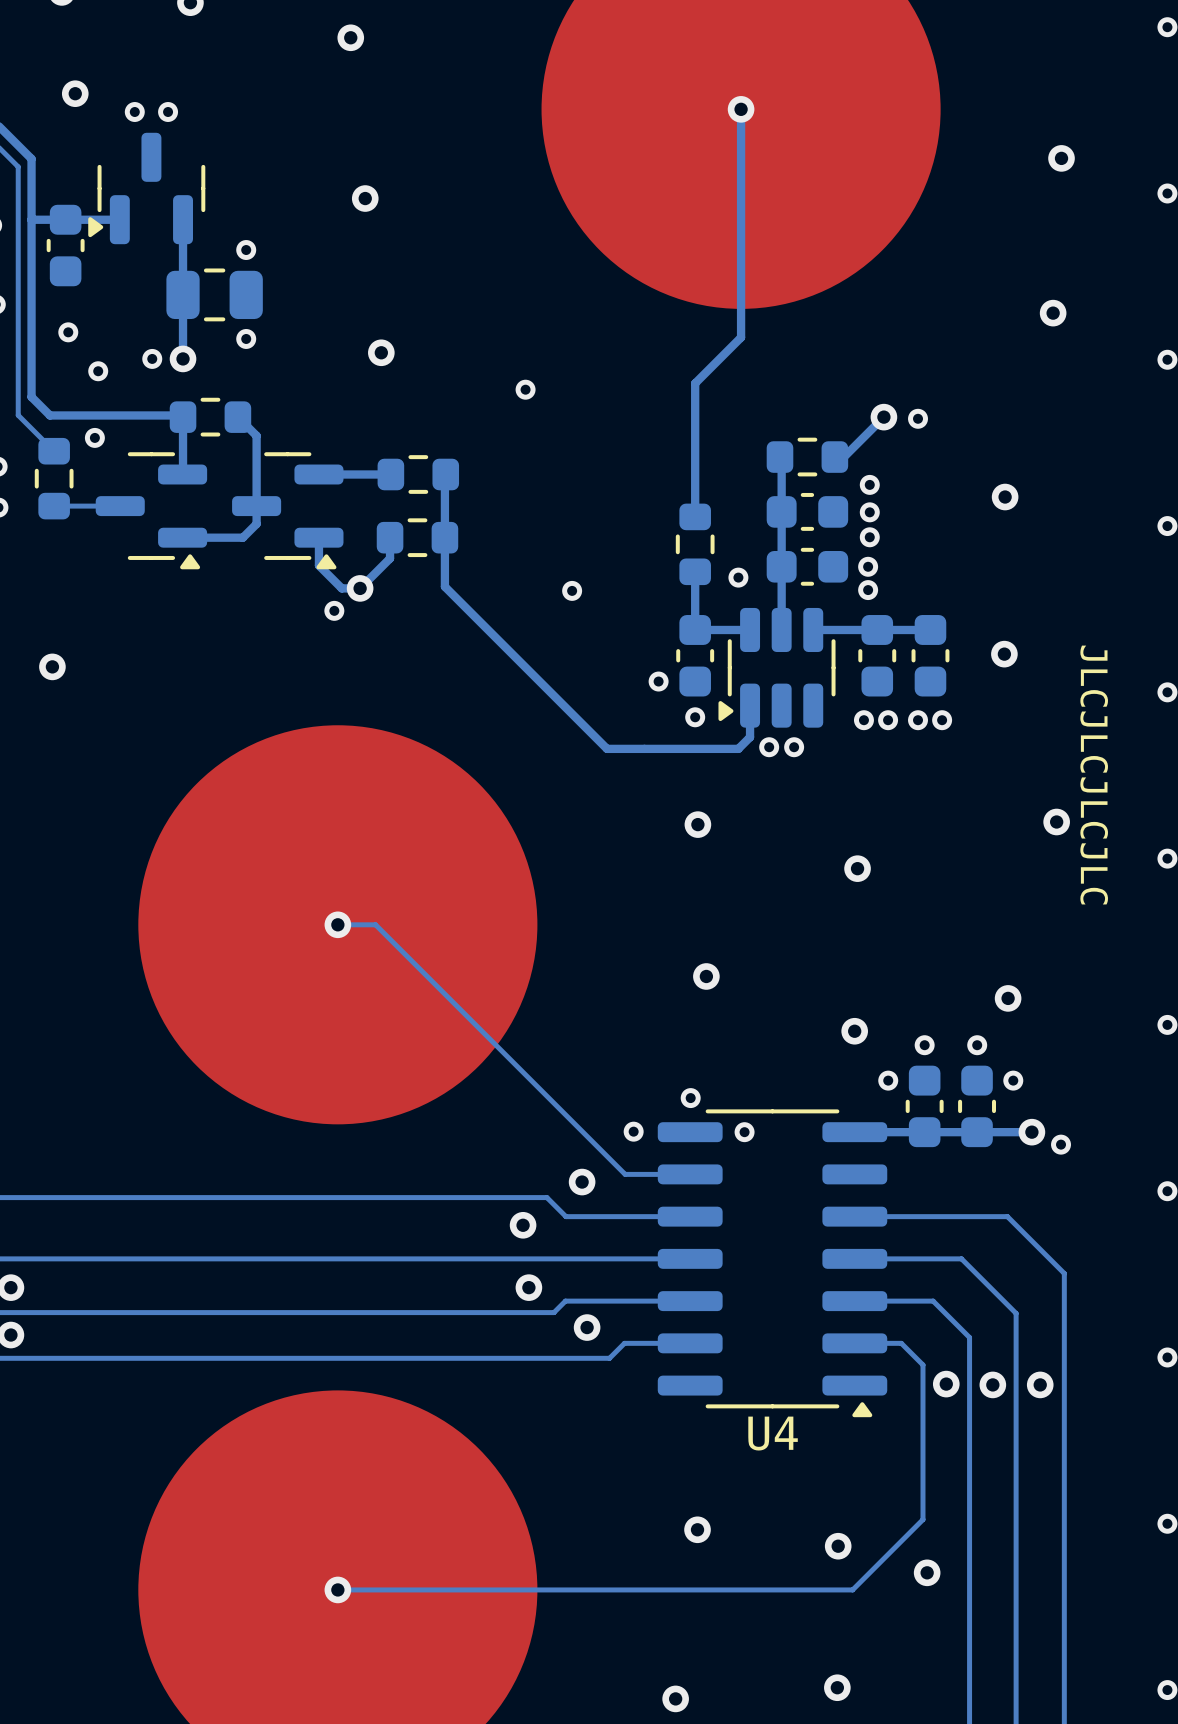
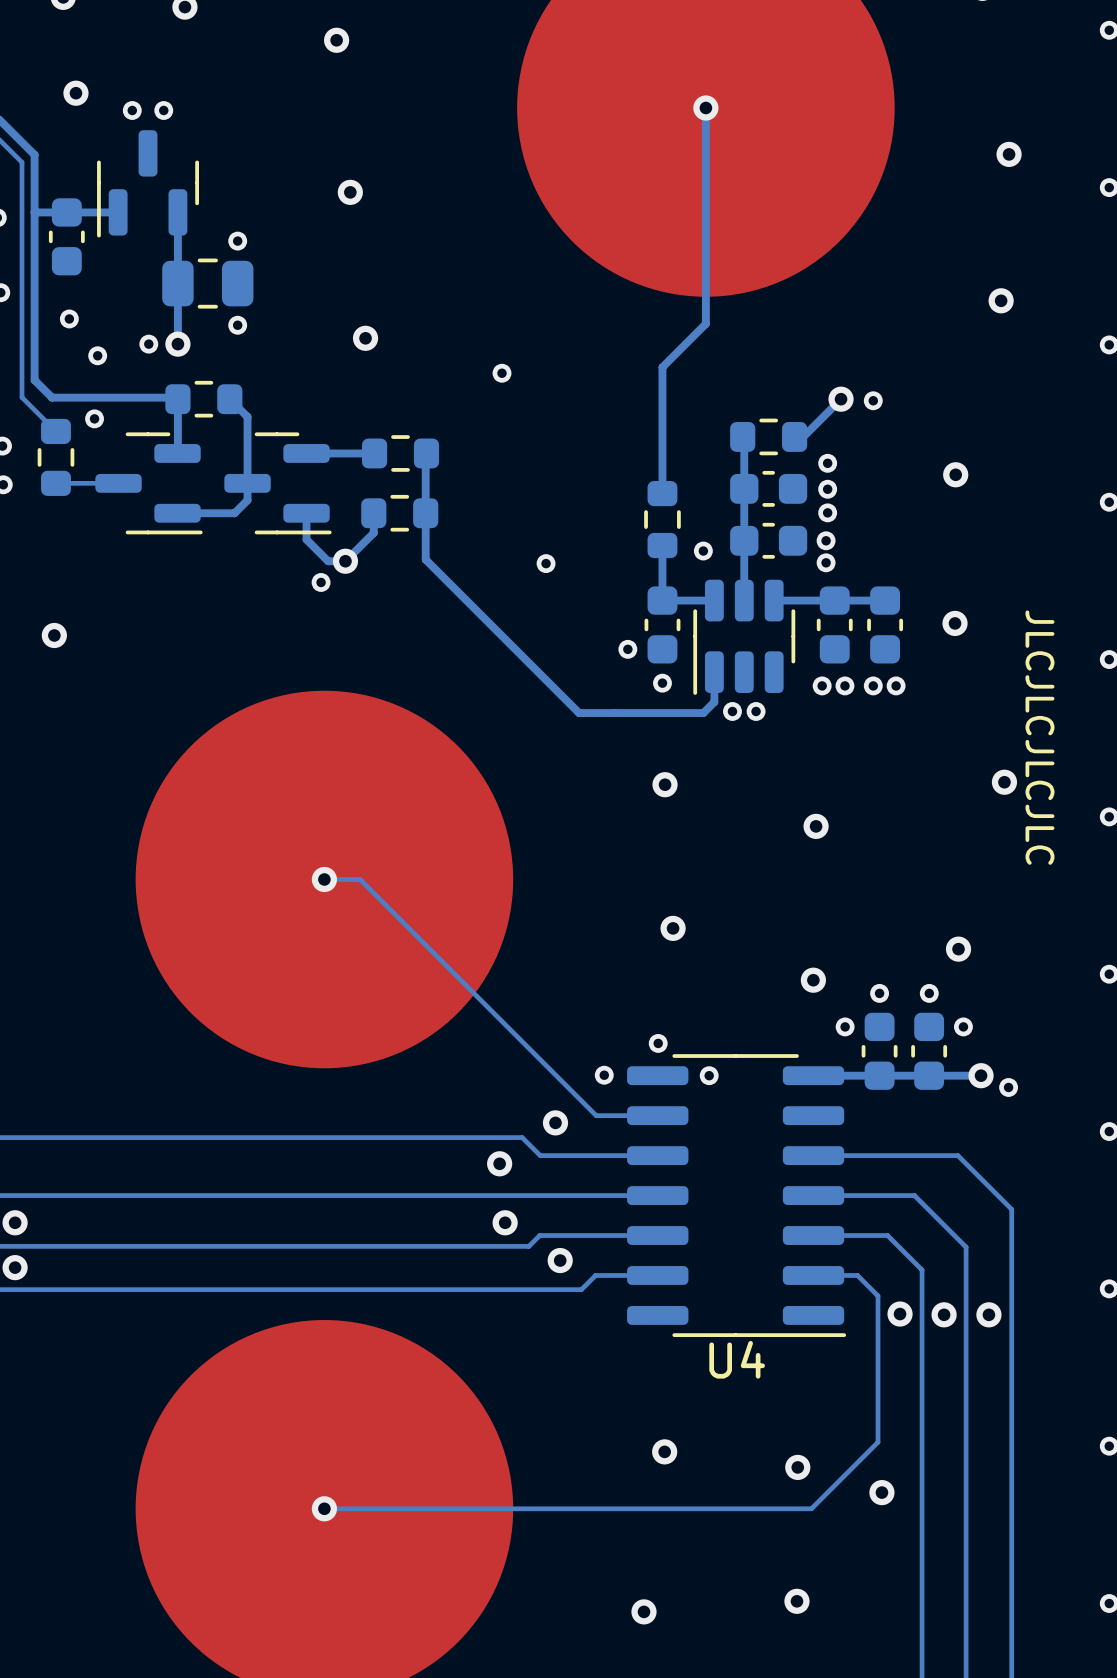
part footprint: [88, 132, 206, 245] -> [97, 130, 200, 238]
part footprint: [95, 452, 208, 570] -> [95, 432, 203, 535]
part footprint: [232, 452, 344, 570] -> [224, 432, 332, 535]
part footprint: [718, 607, 836, 728] -> [693, 579, 796, 695]
U4 footprint: [657, 1109, 888, 1418] -> [627, 1054, 847, 1338]

